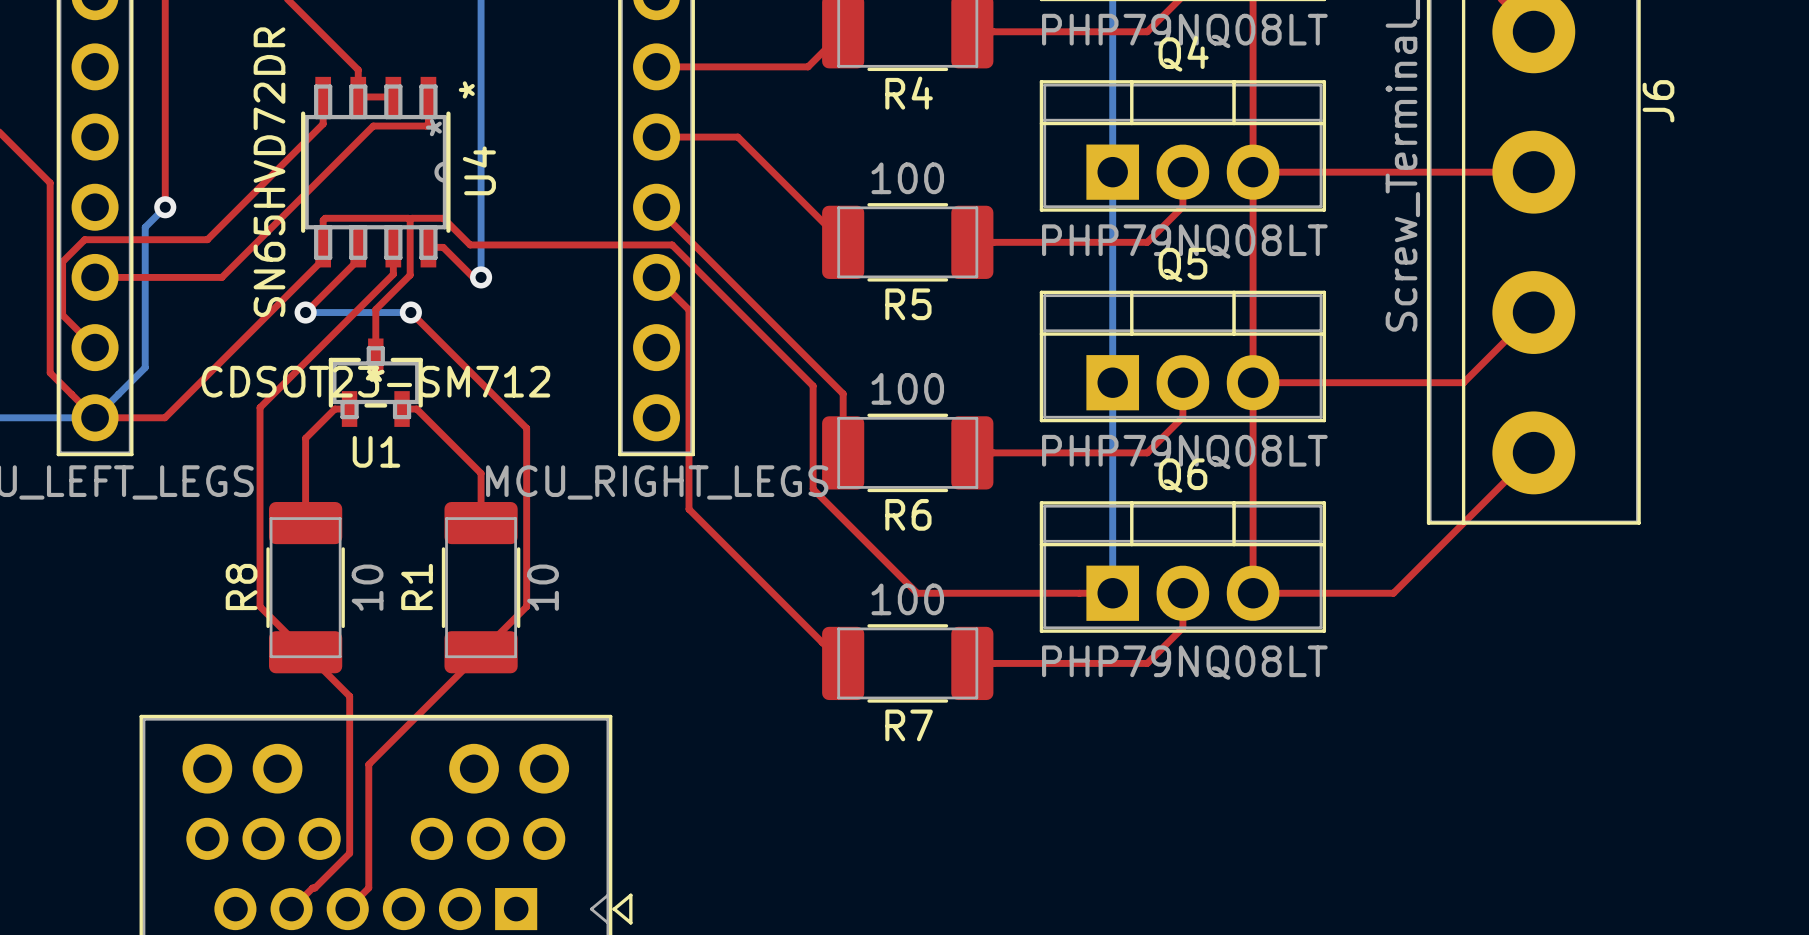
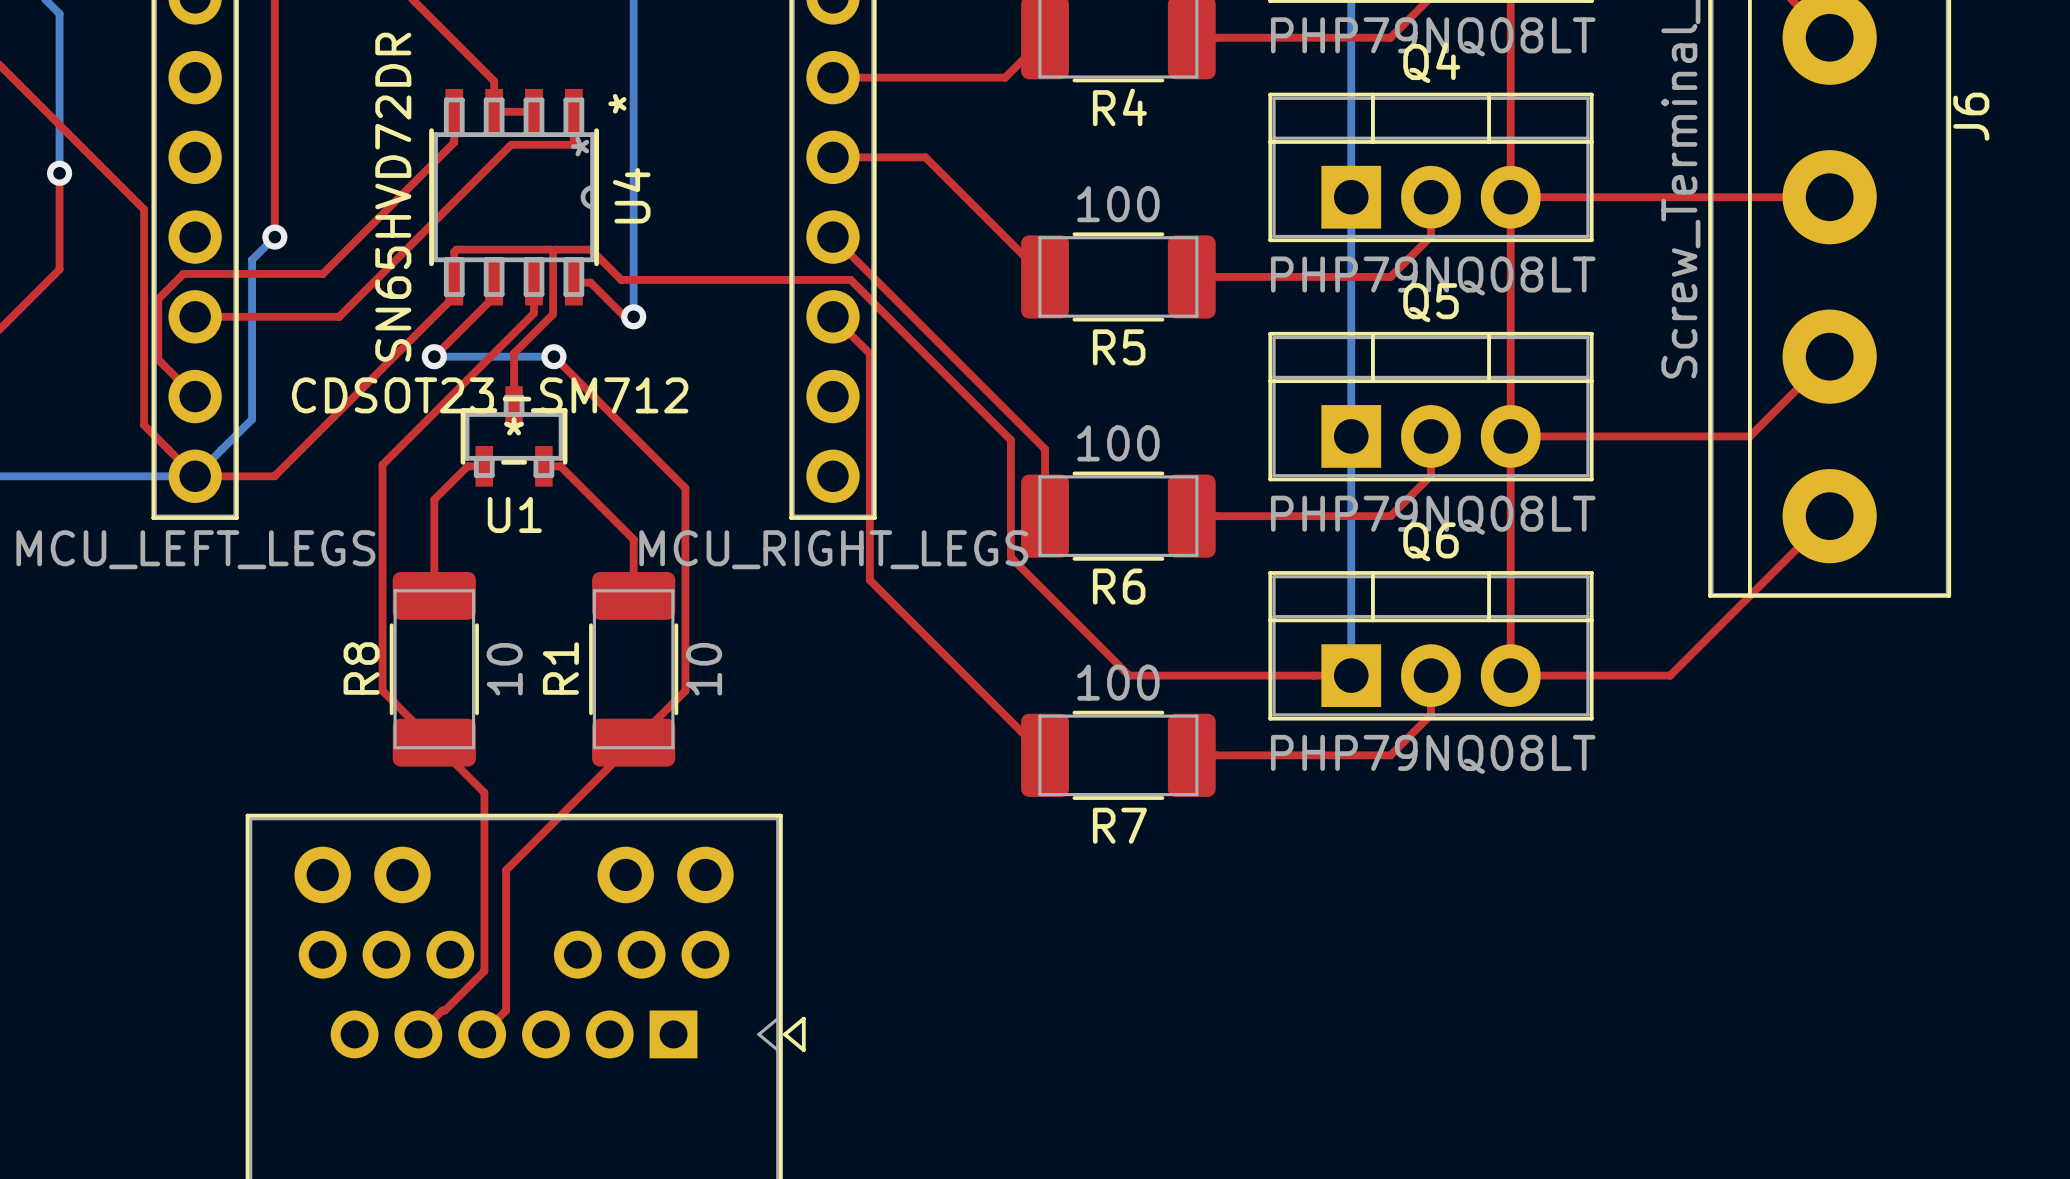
U1 value position: CDSOT23-SM712 (375, 381) -> CDSOT23-SM712 (490, 395)

